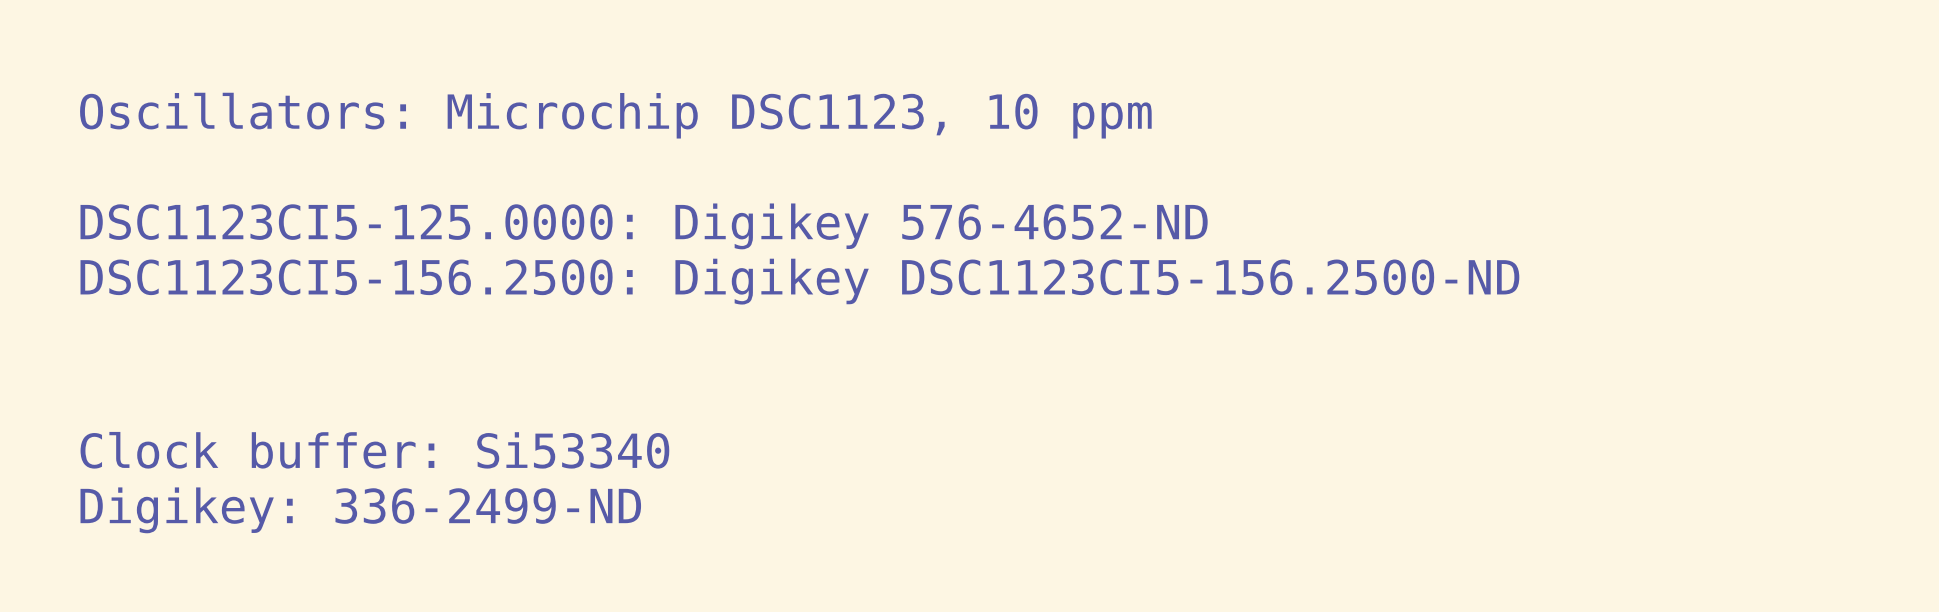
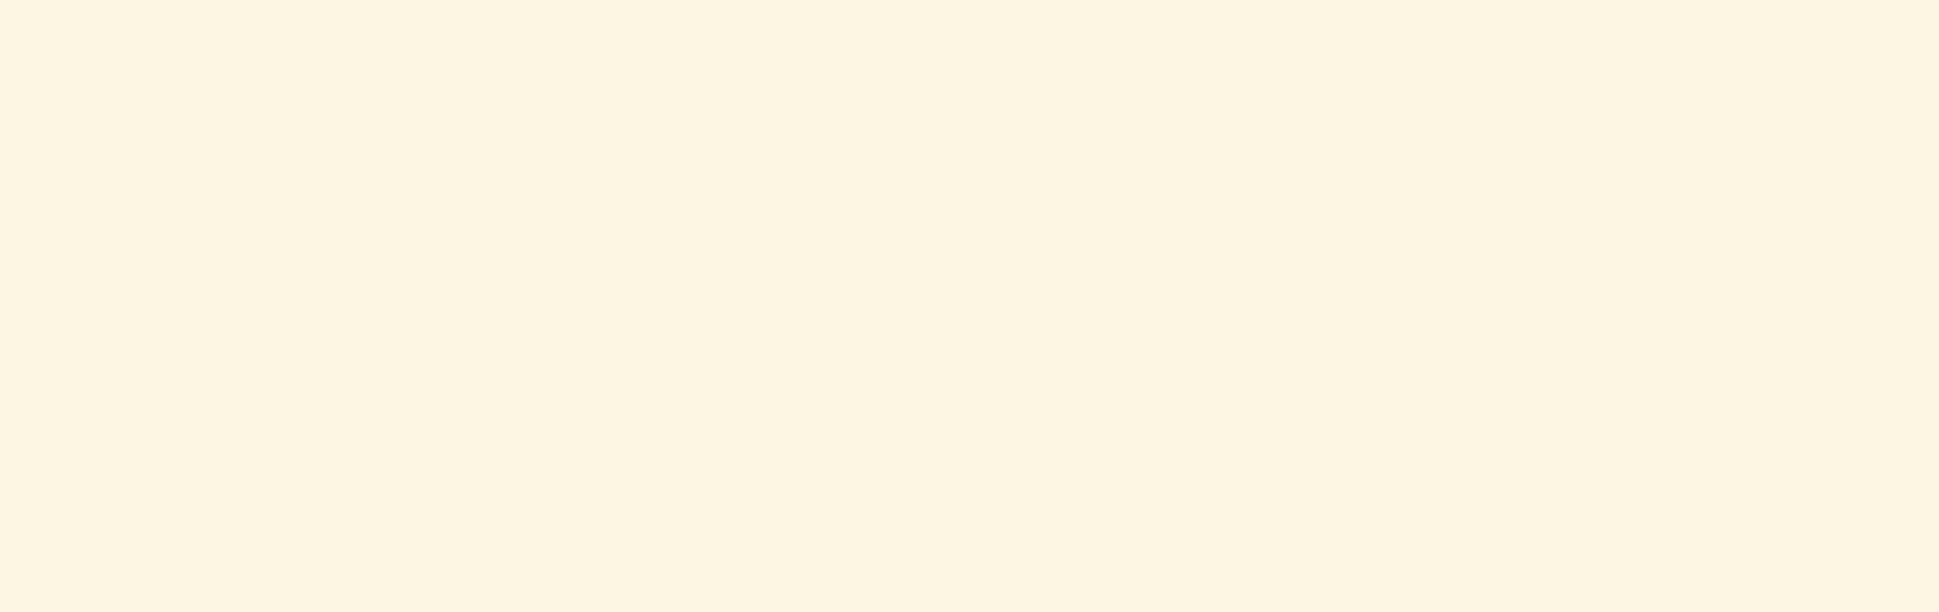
text: Oscillators: Microchip DSC1123, 10 ppm (615, 115) -> none
text: DSC1123CI5-125.0000: Digikey 576-4652-ND (644, 226) -> none
text: DSC1123CI5-156.2500: Digikey DSC1123CI5-156.2500-ND (799, 281) -> none
text: Clock buffer: Si53340 (374, 450) -> none
text: Digikey: 336-2499-ND (360, 510) -> none

